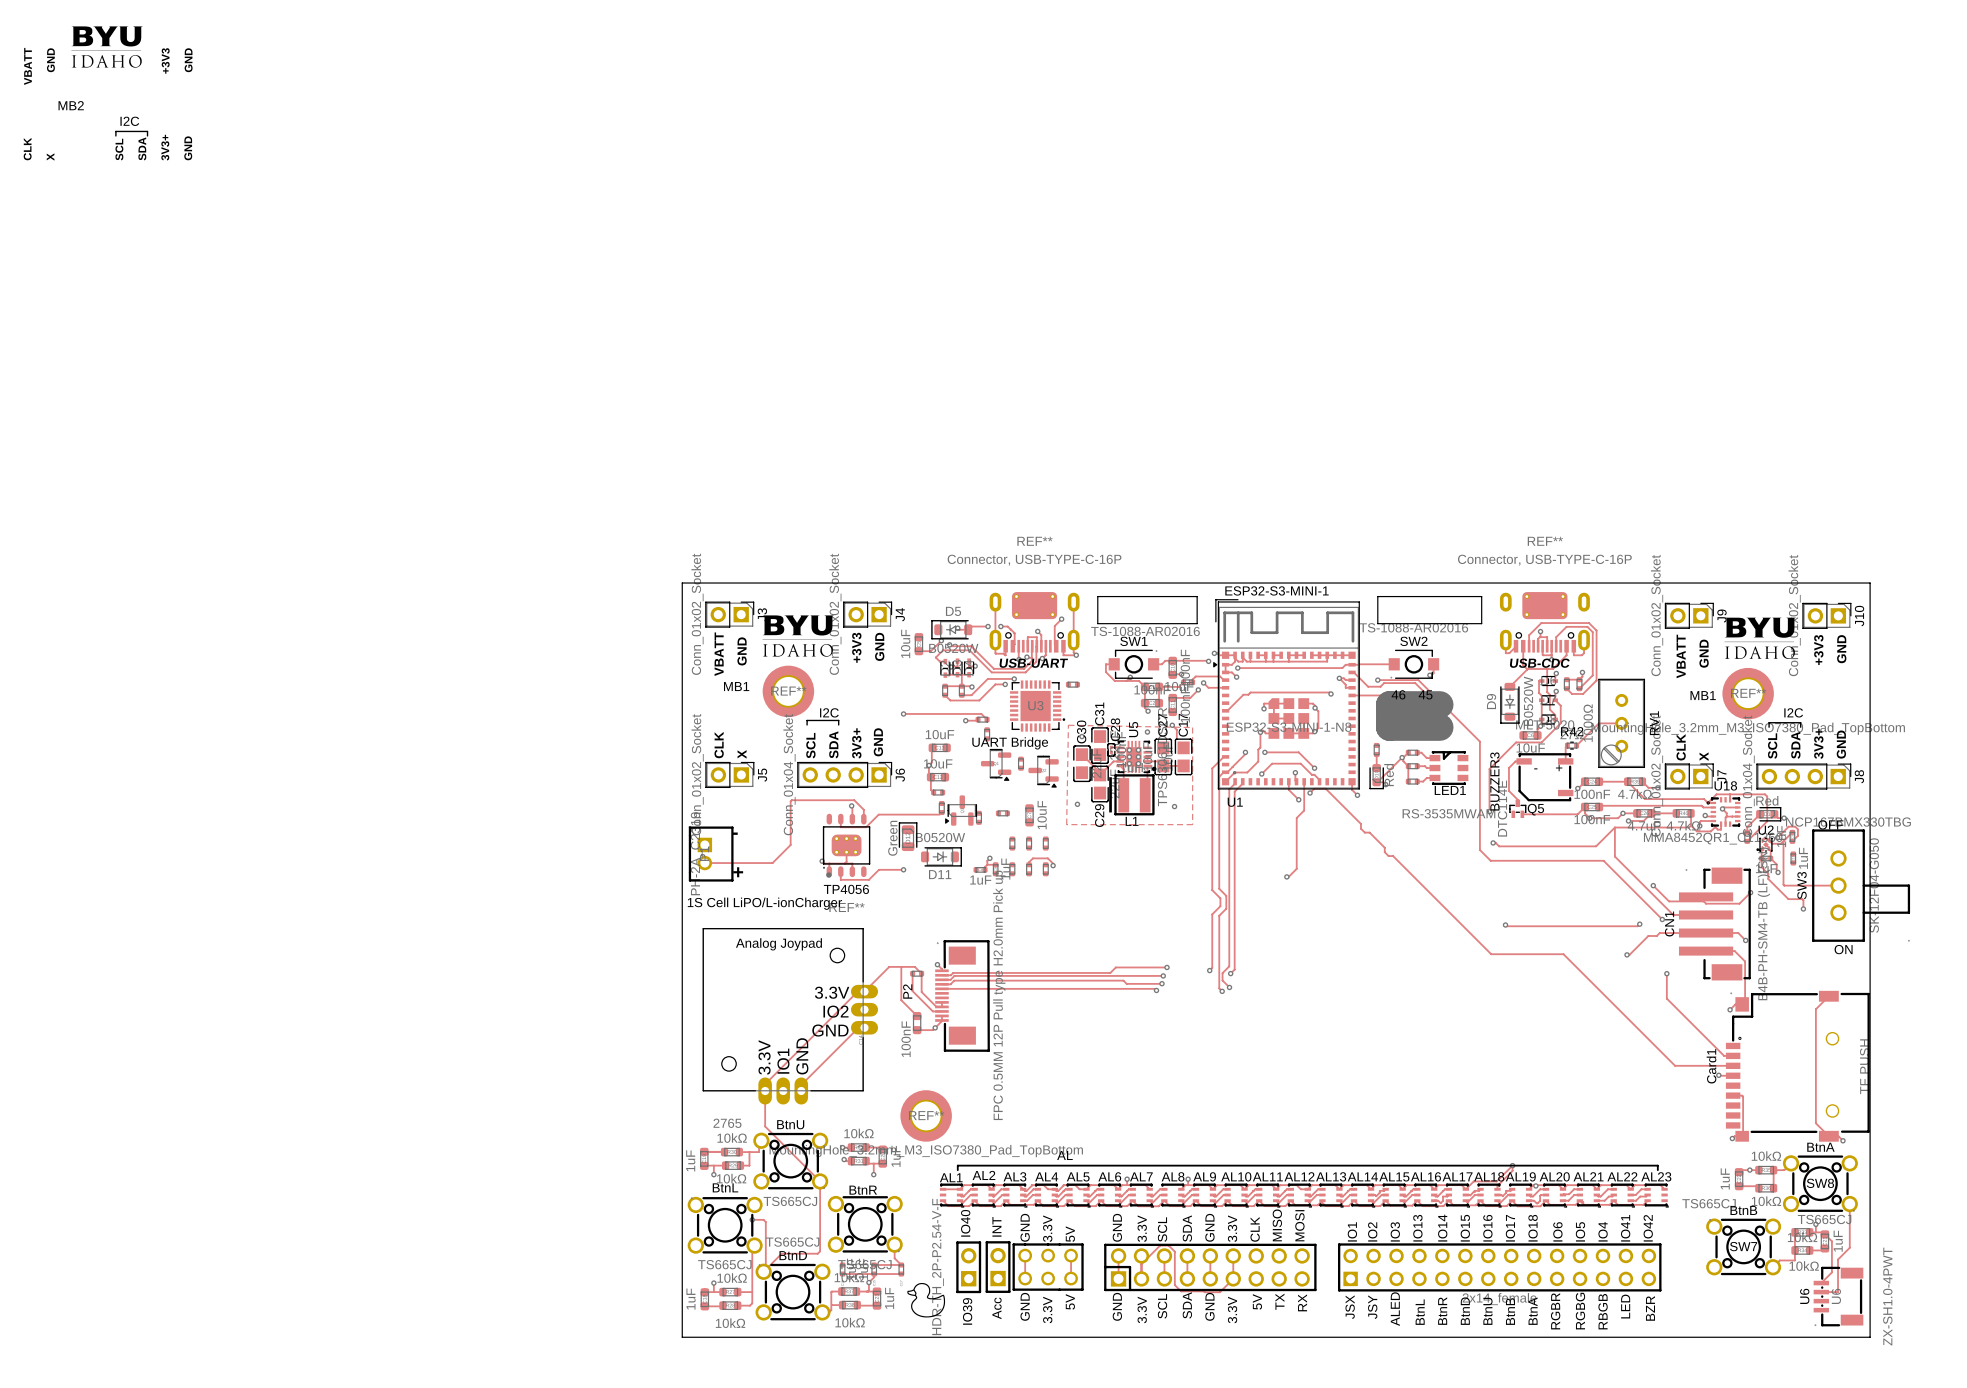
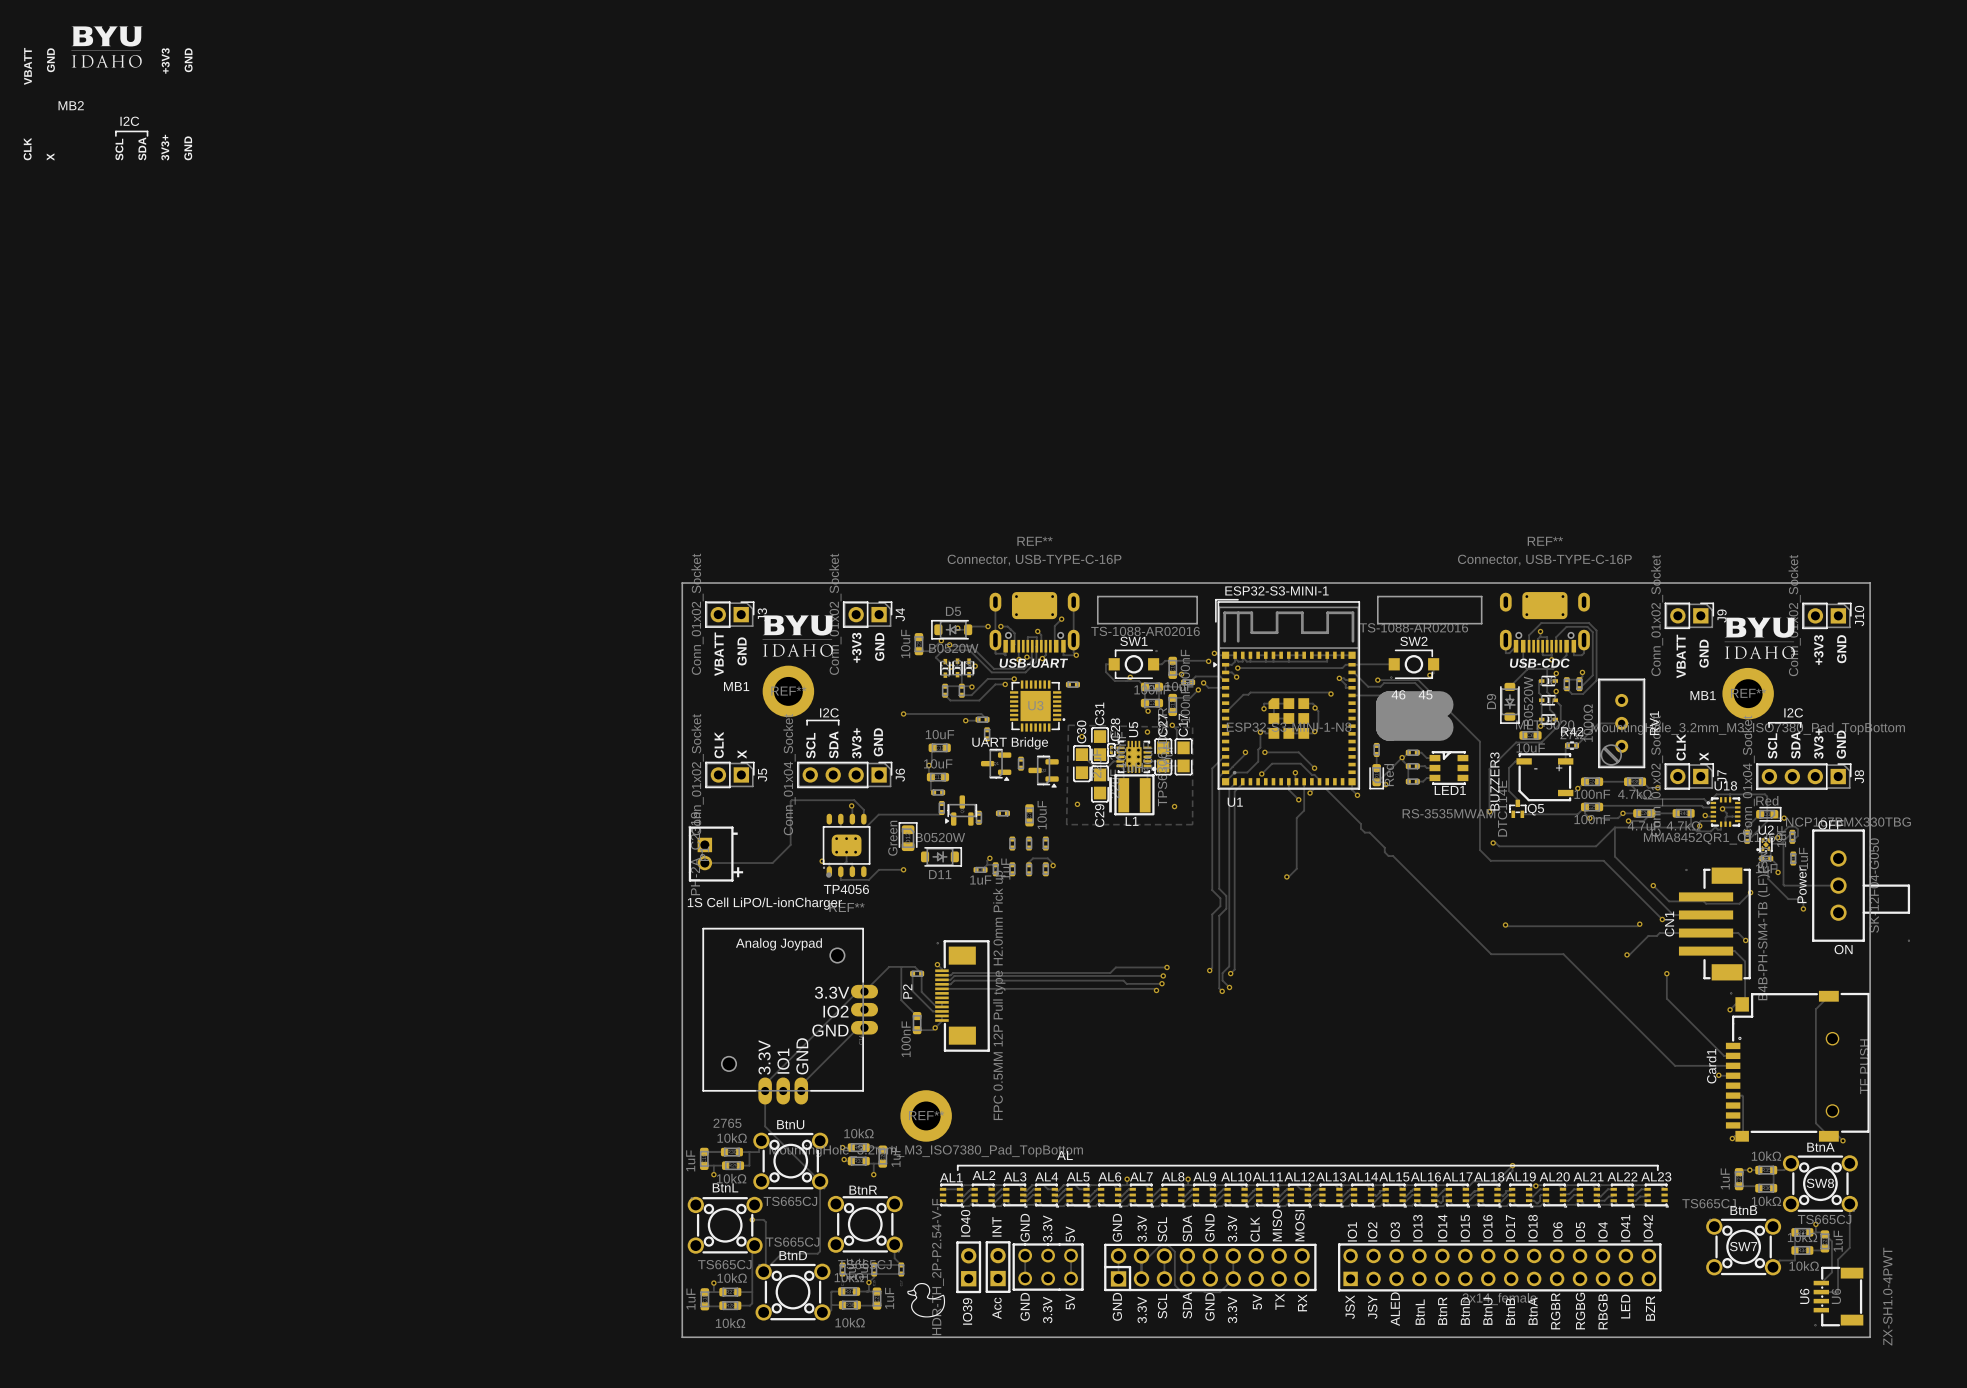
SW3 name: SW3 (1802, 885) -> Power (1802, 885)

